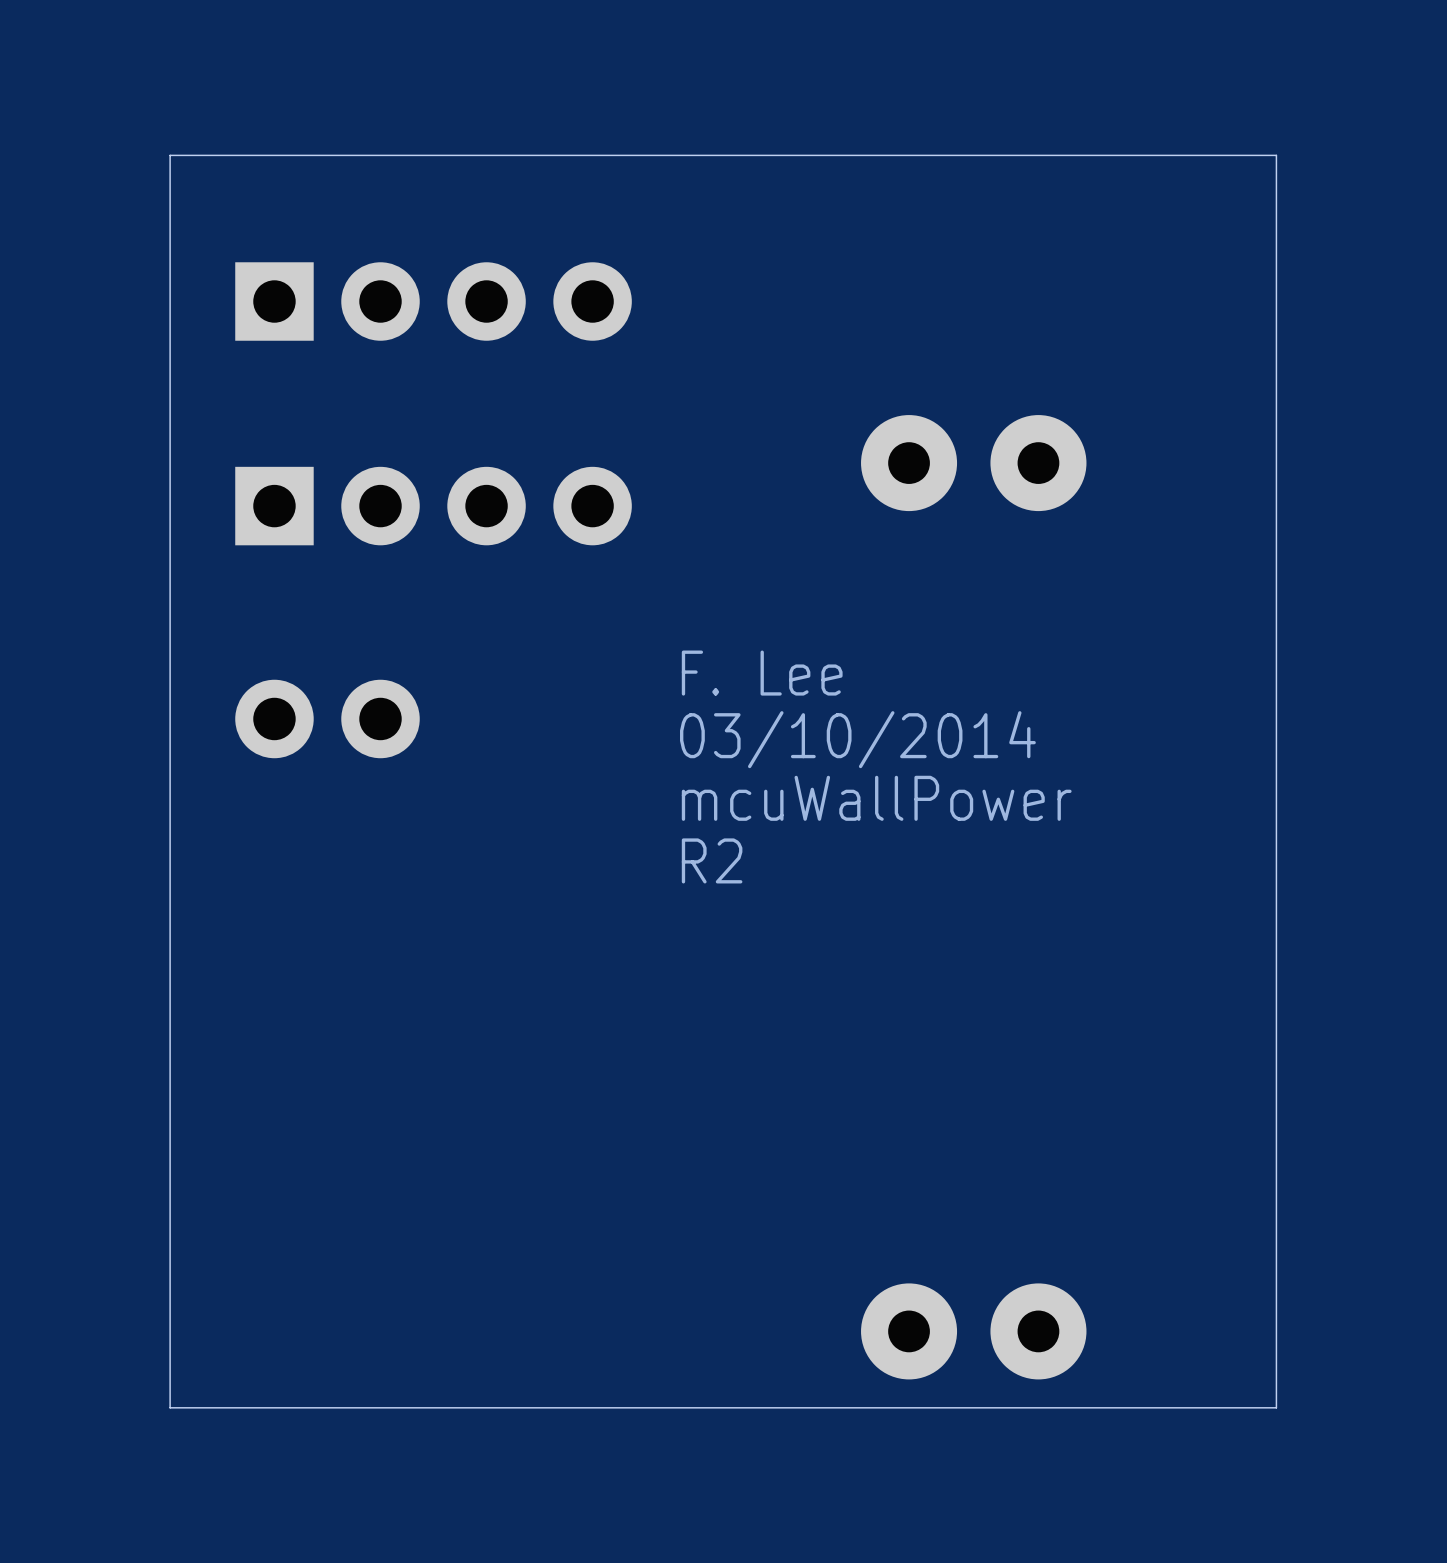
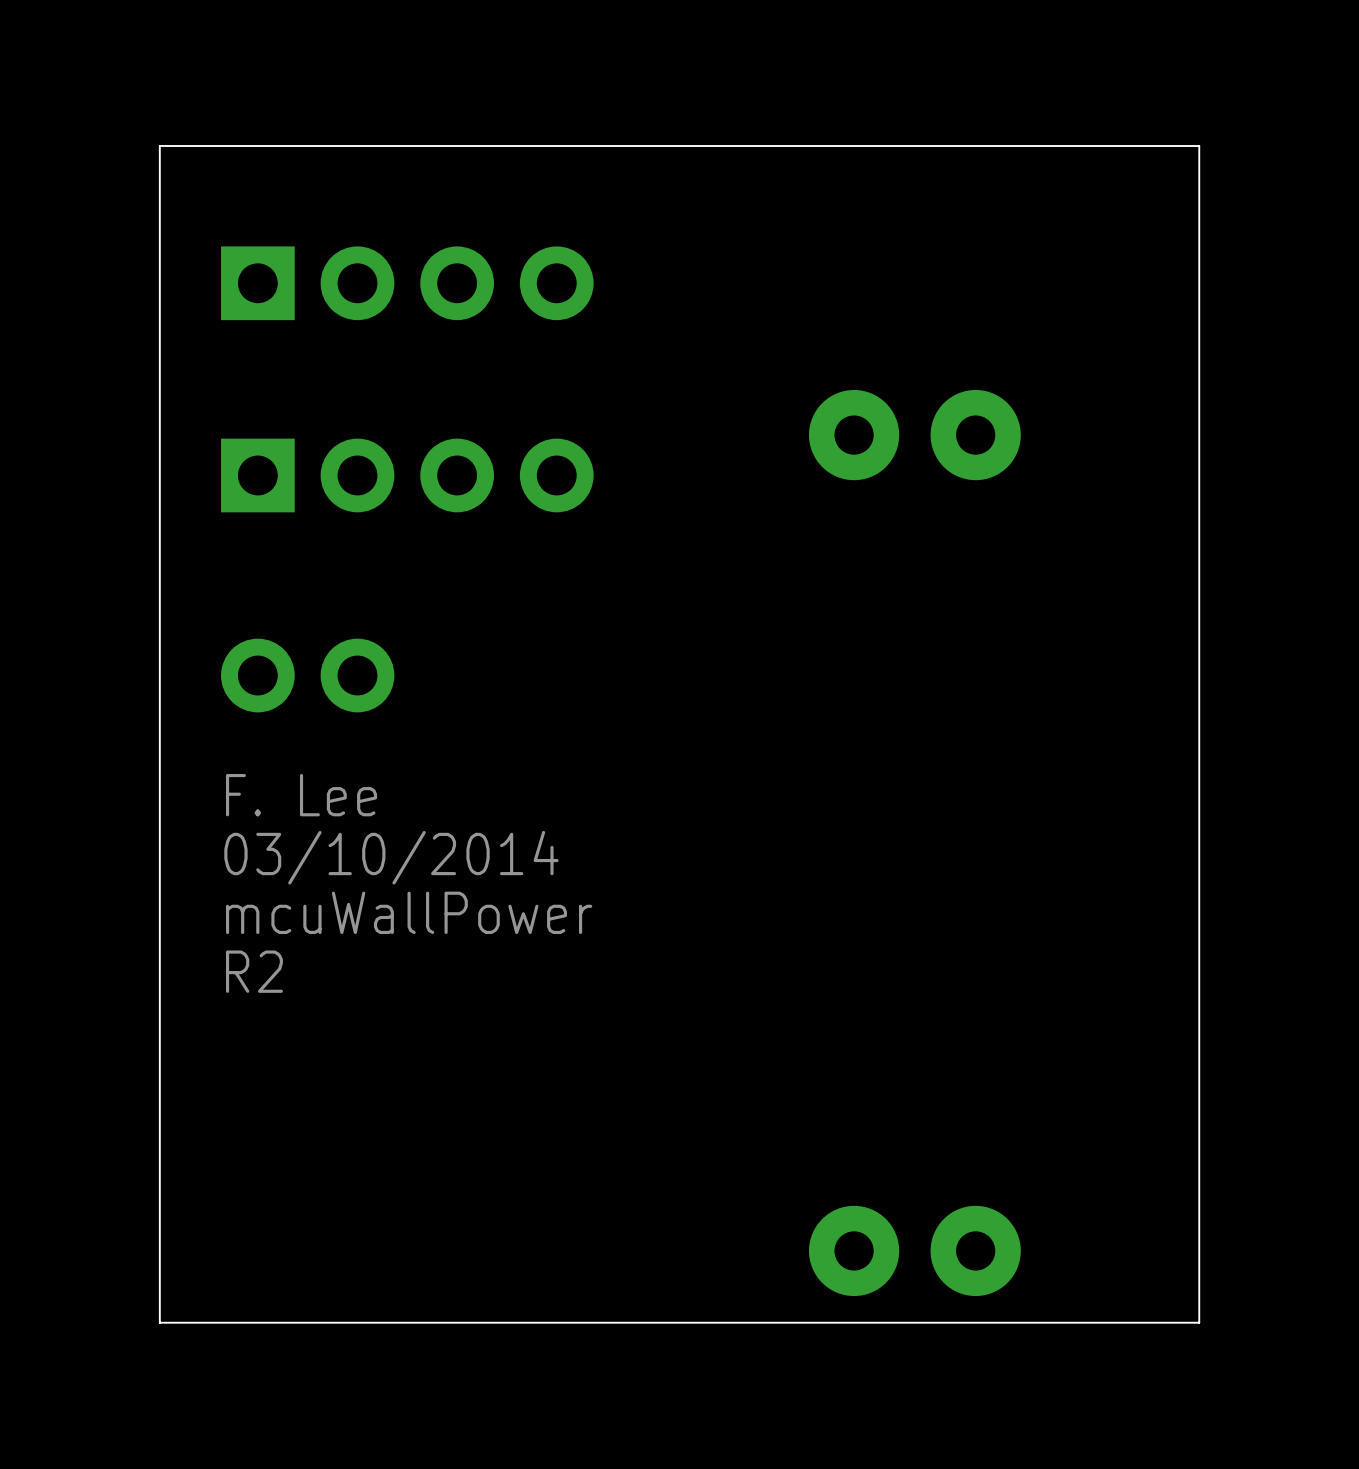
text position: F. Lee (762, 673) -> F. Lee (301, 795)
text position: 03/10/2014 (857, 739) -> 03/10/2014 (391, 857)
text position: mcuWallPower (876, 798) -> mcuWallPower (409, 912)
text position: R2 (712, 860) -> R2 (254, 971)

